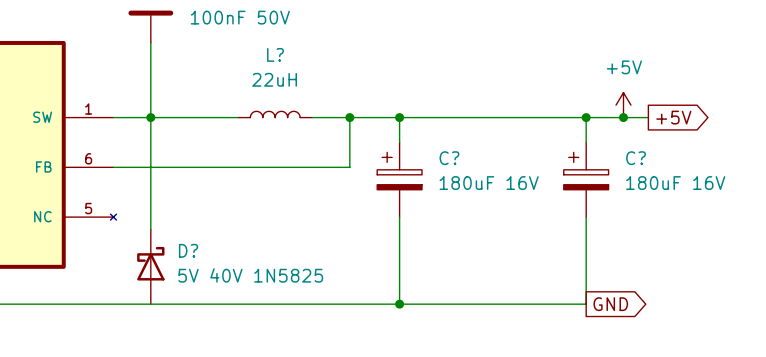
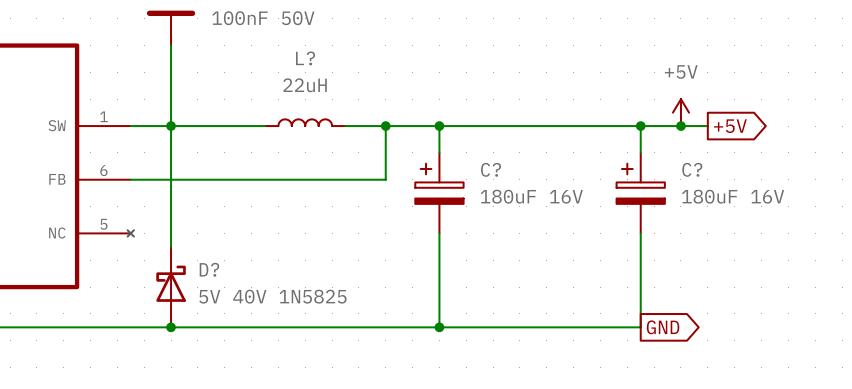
junction: none -> (171, 327)

